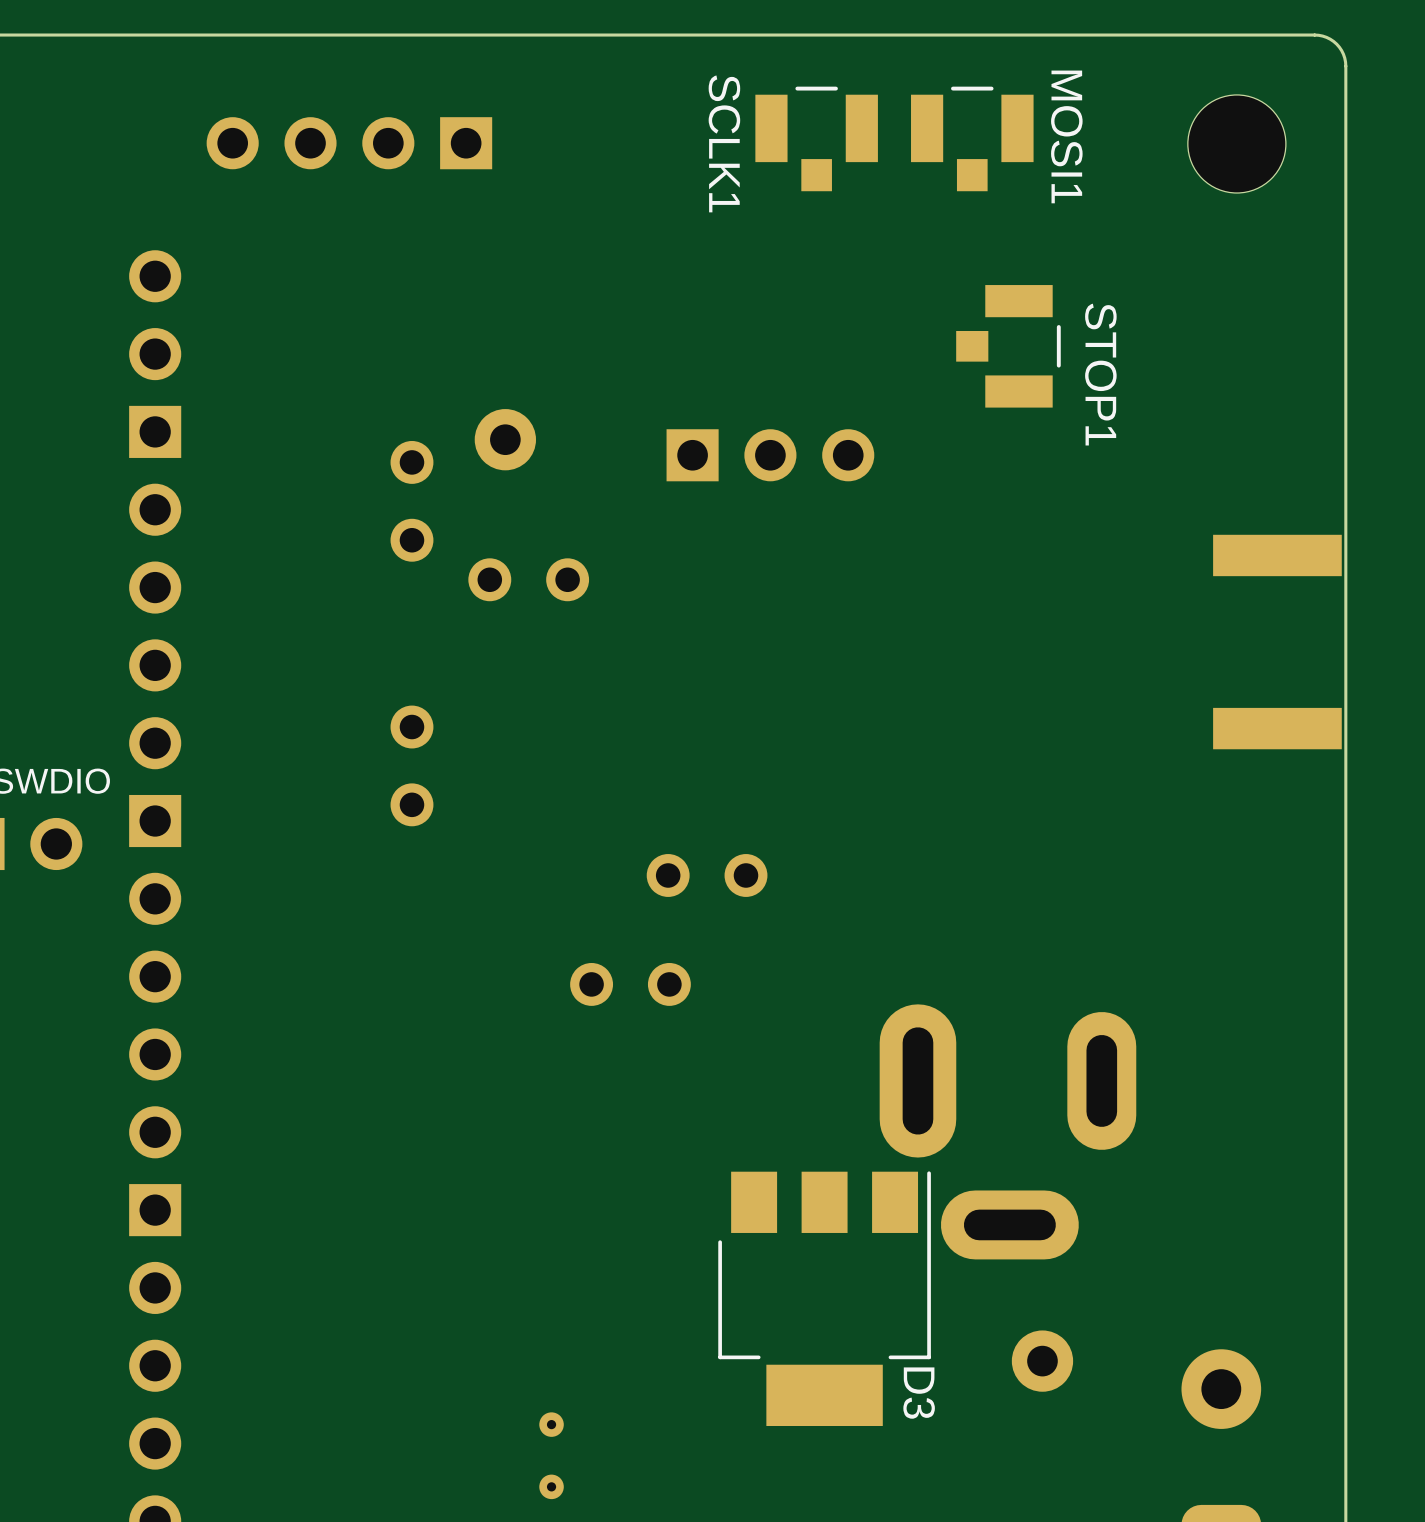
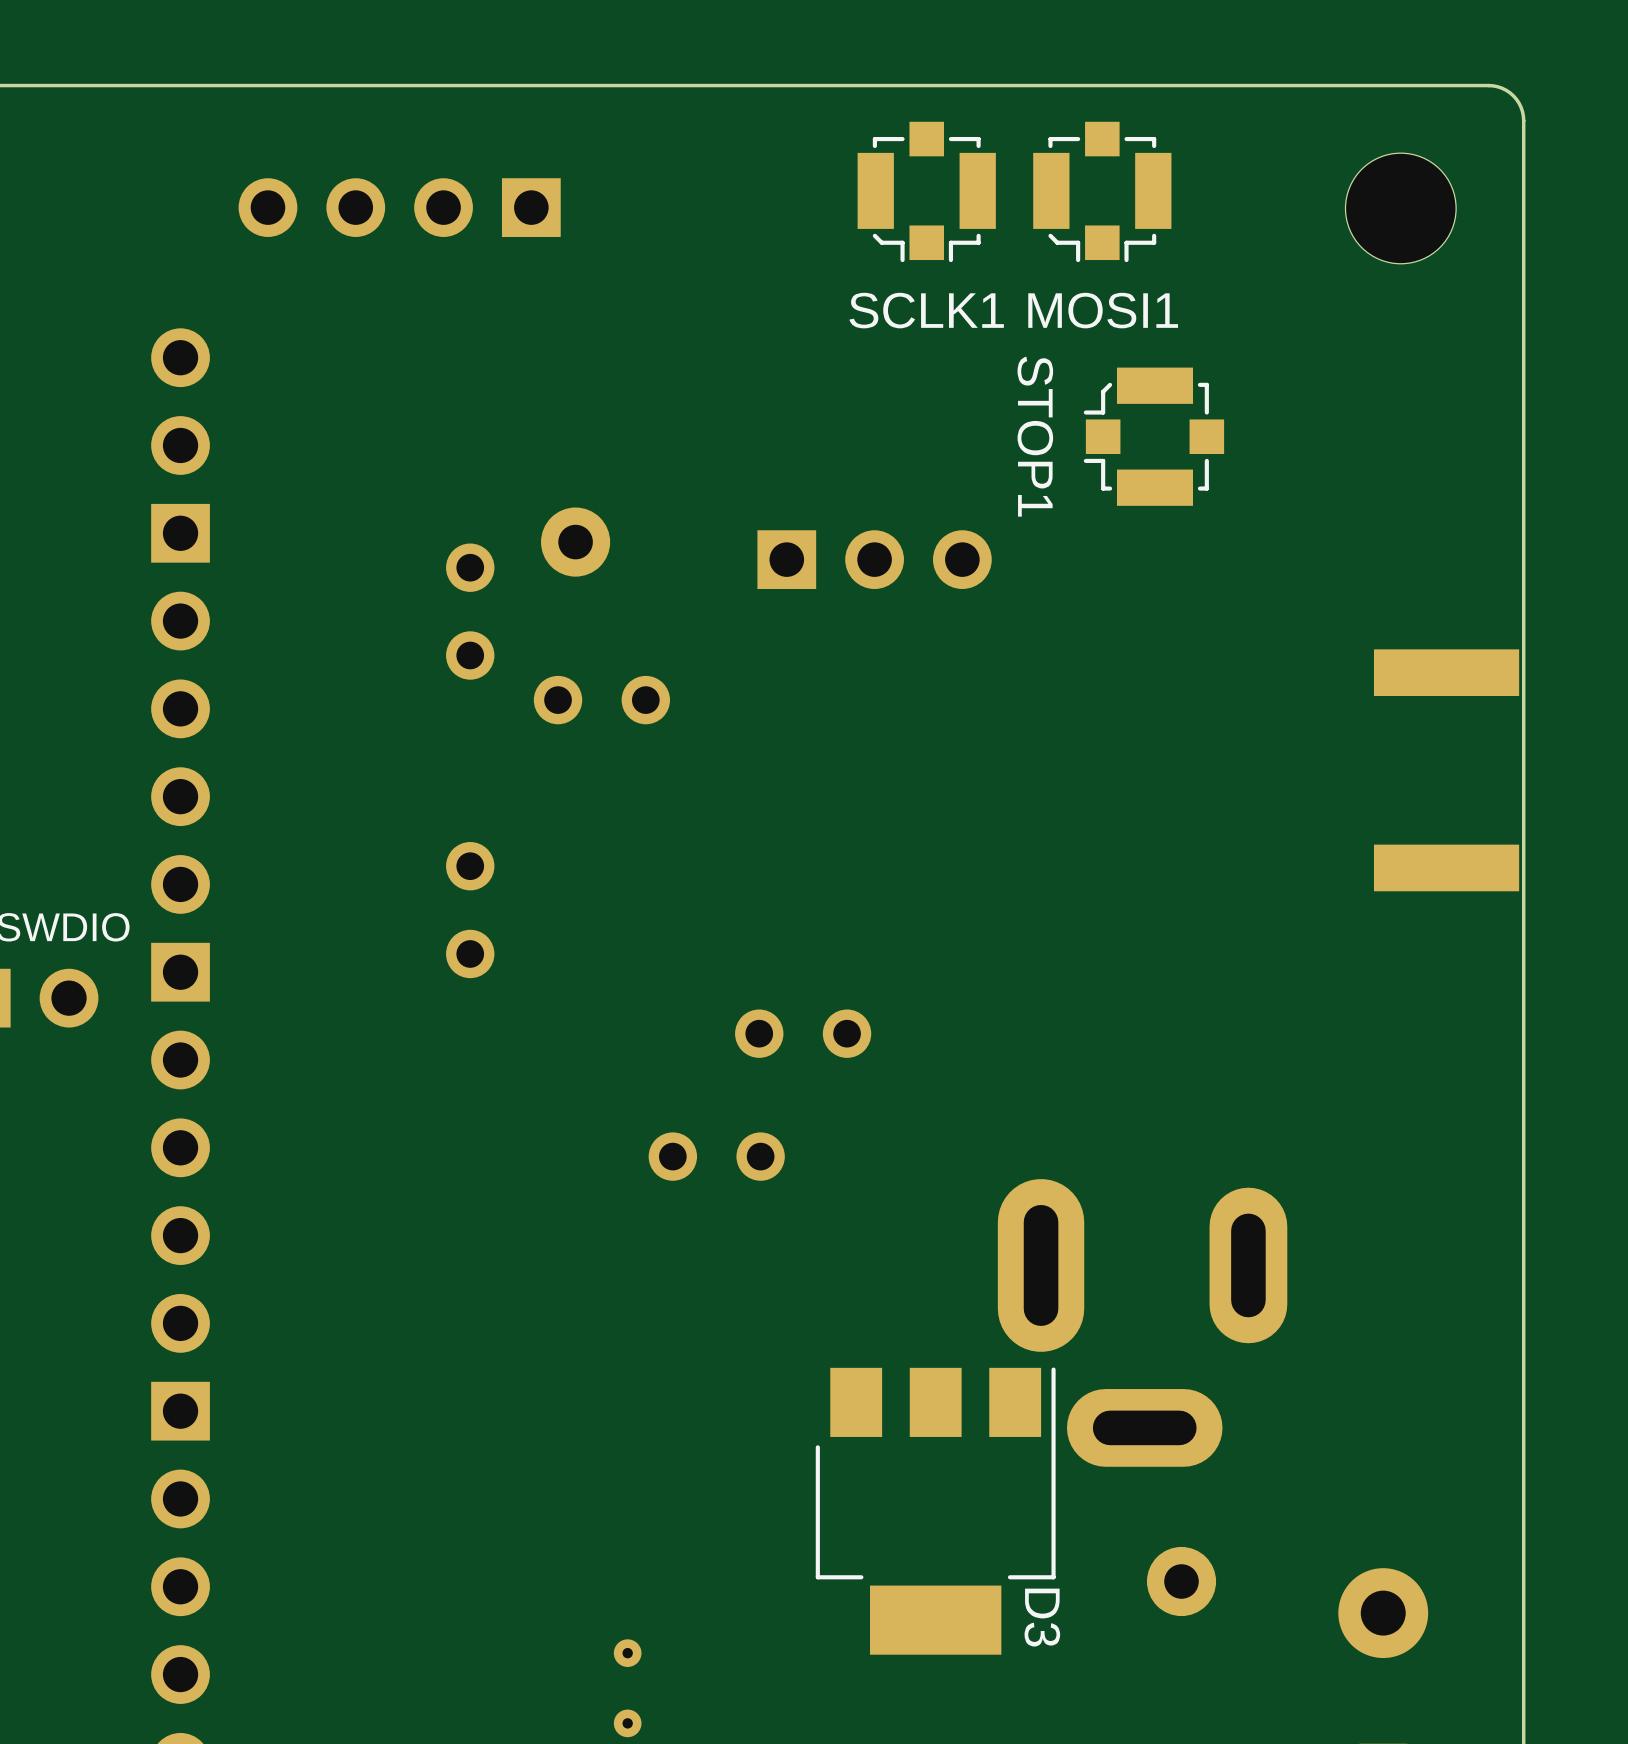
SCLK1 footprint: [755, 86, 878, 192] -> [857, 121, 996, 263]
MOSI1 footprint: [911, 86, 1034, 192] -> [1033, 121, 1172, 263]
MOSI1 name position: MOSI1 (1066, 136) -> MOSI1 (1103, 310)
SCLK1 name position: SCLK1 (724, 143) -> SCLK1 (926, 310)
STOP1 footprint: [956, 285, 1061, 408] -> [1083, 367, 1225, 506]
STOP1 name position: STOP1 (1100, 374) -> STOP1 (1035, 436)

